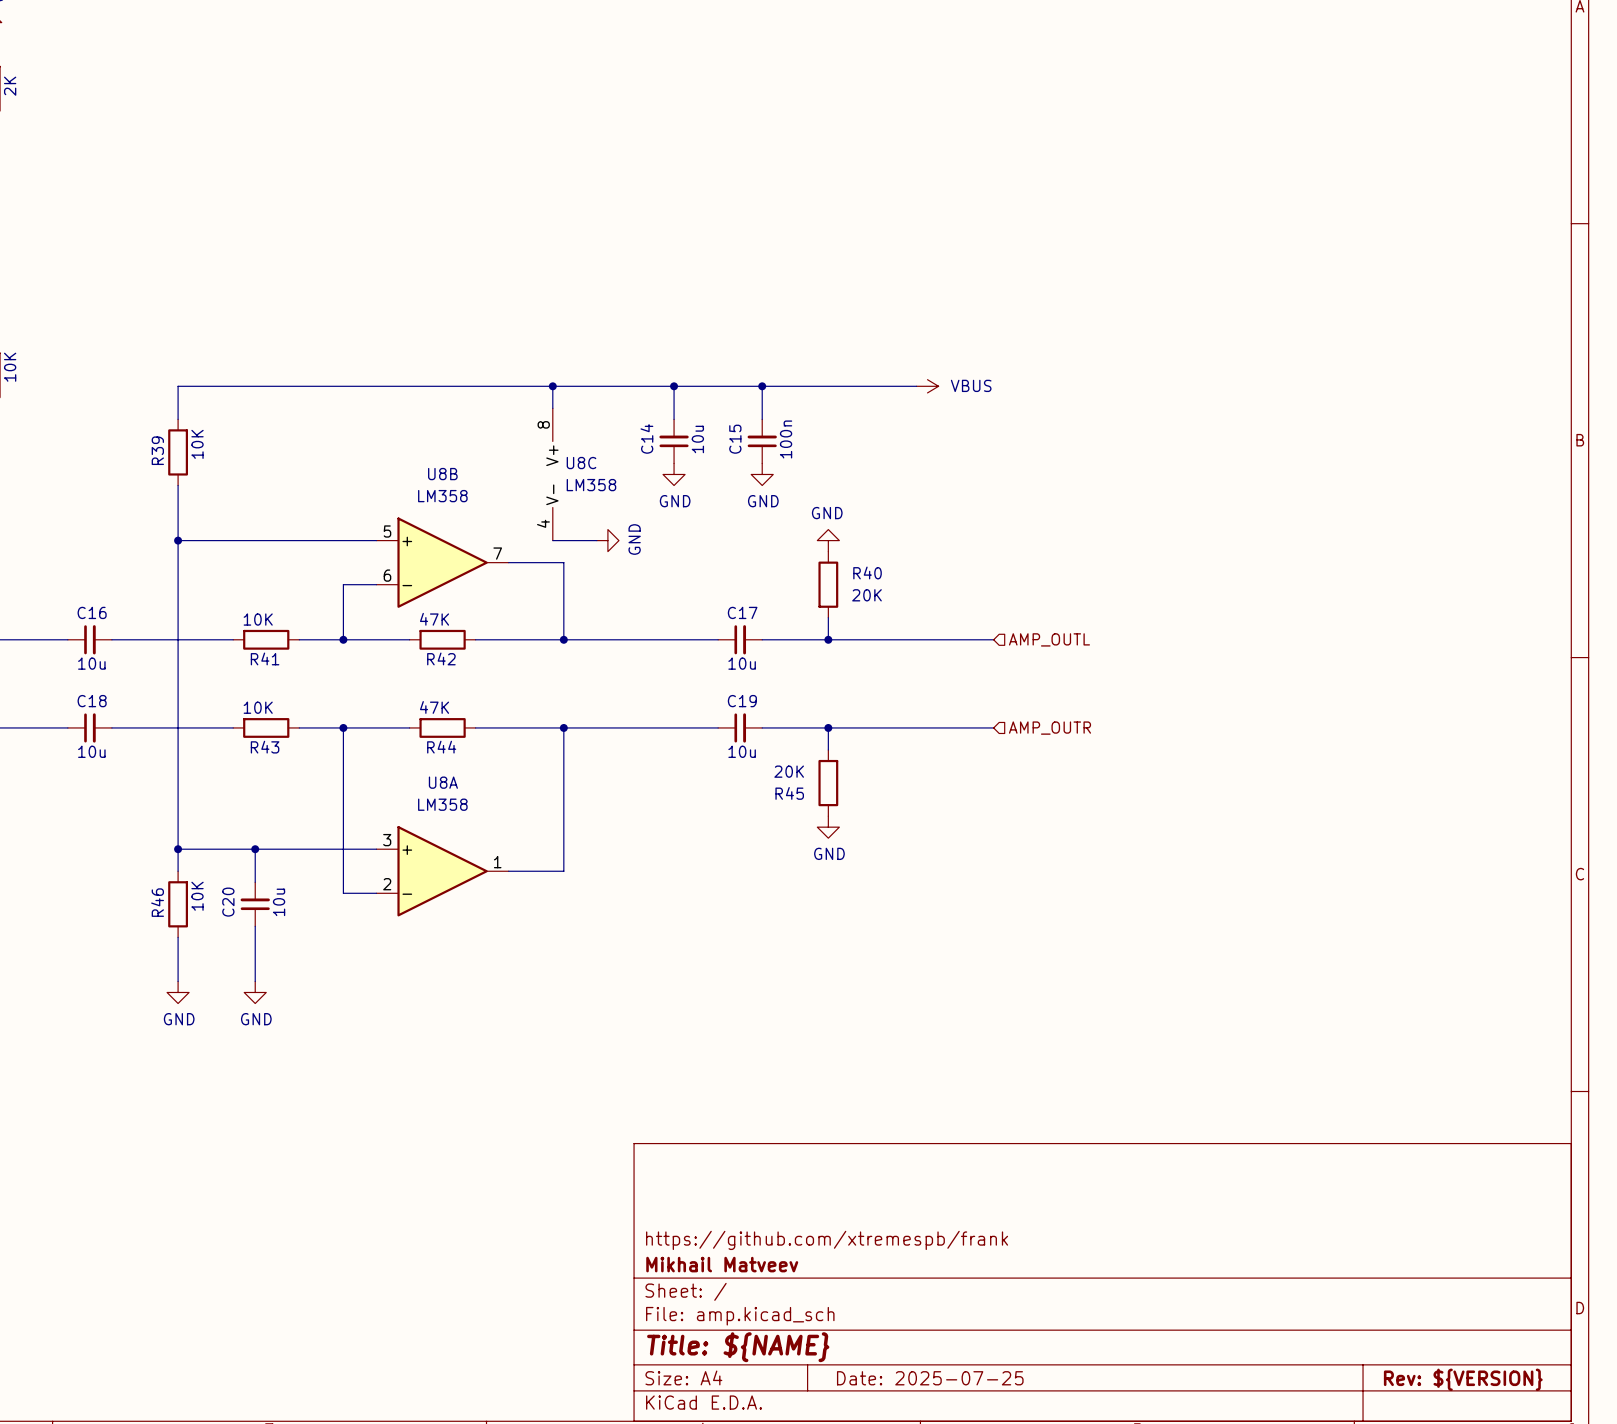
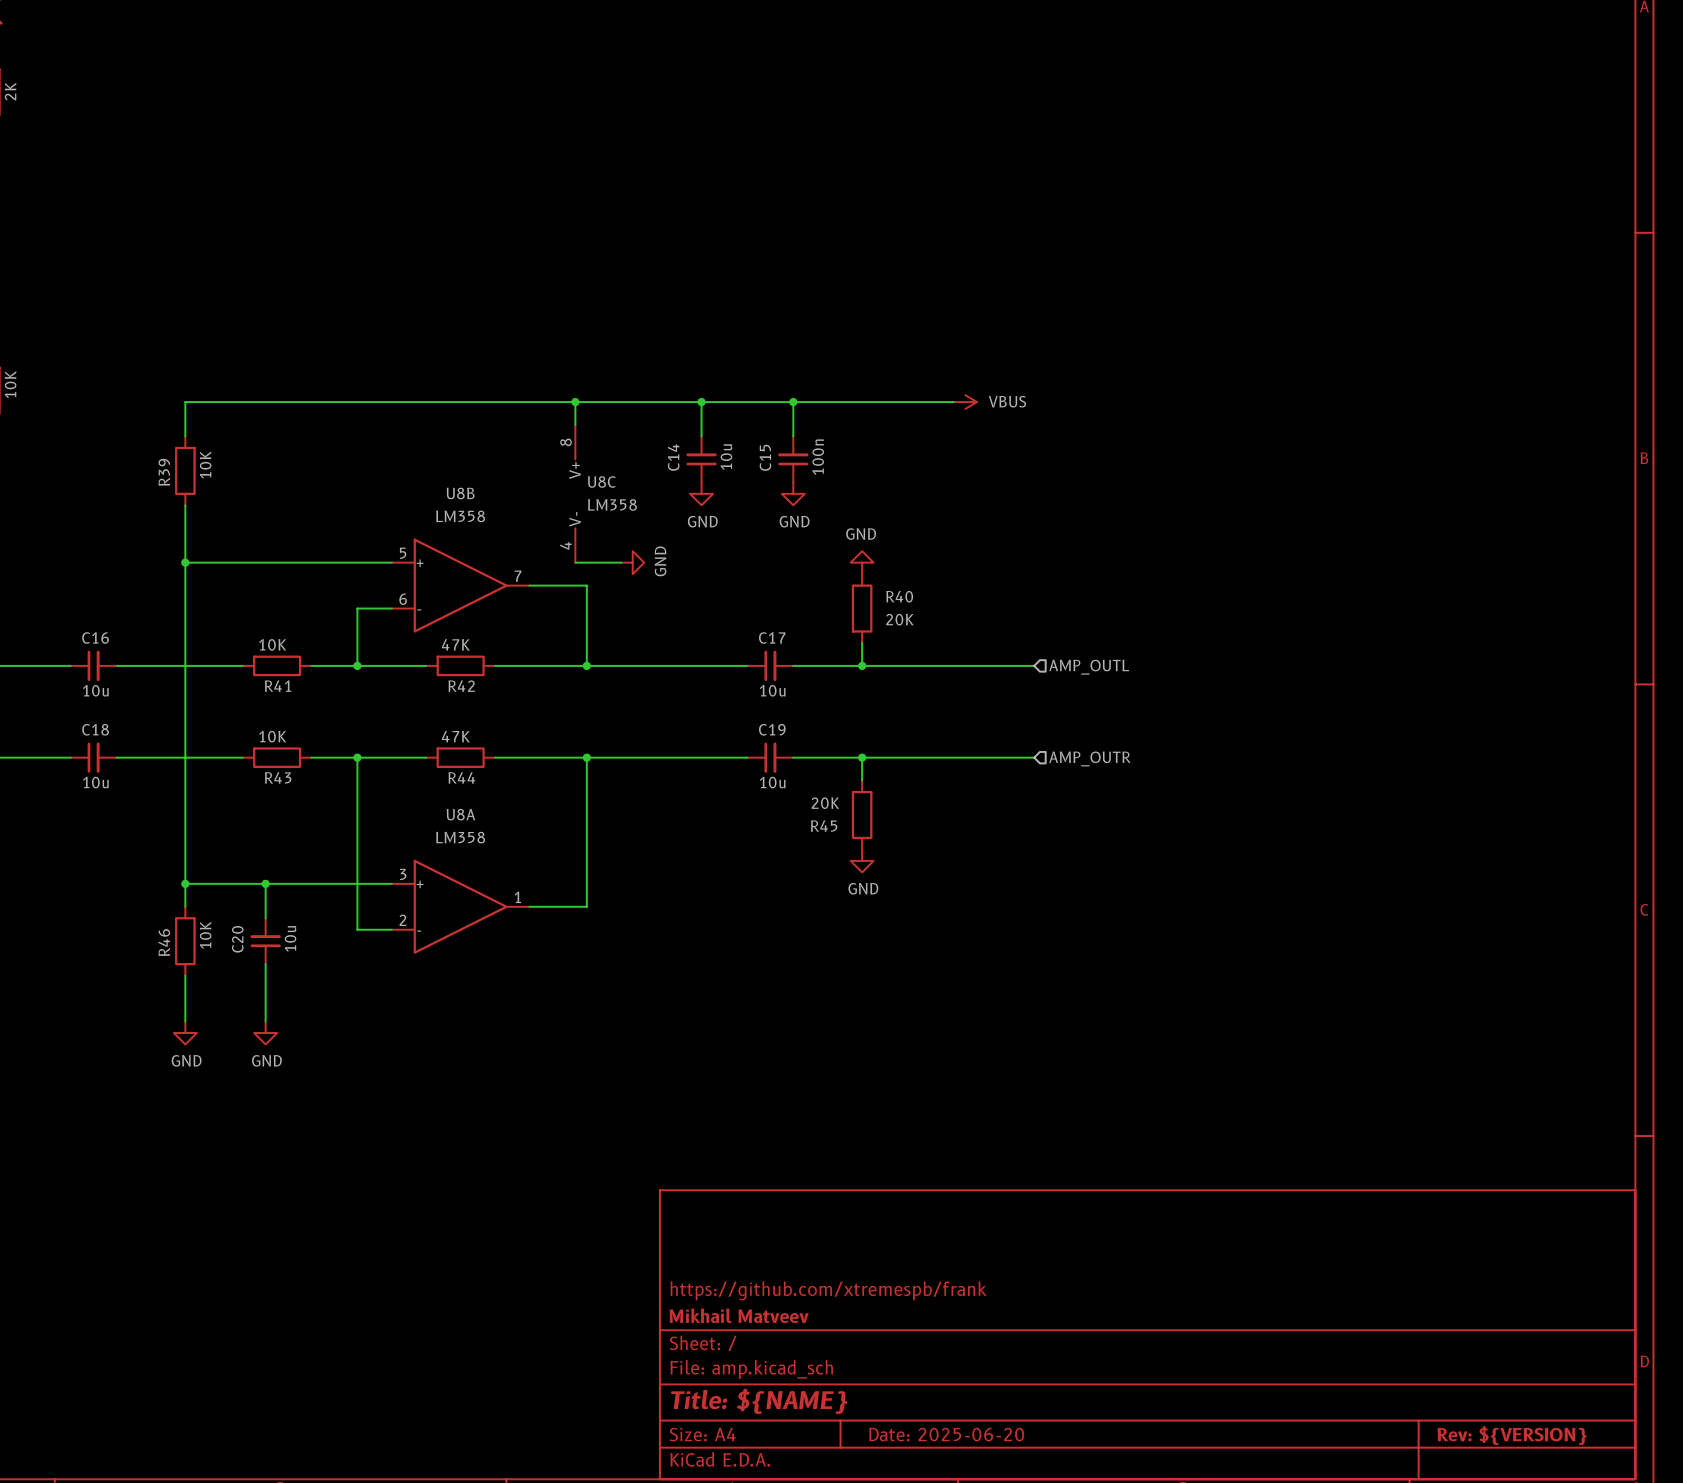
title block: Date: 2025-07-25 (930, 1378) -> Date: 2025-06-20 (946, 1434)

